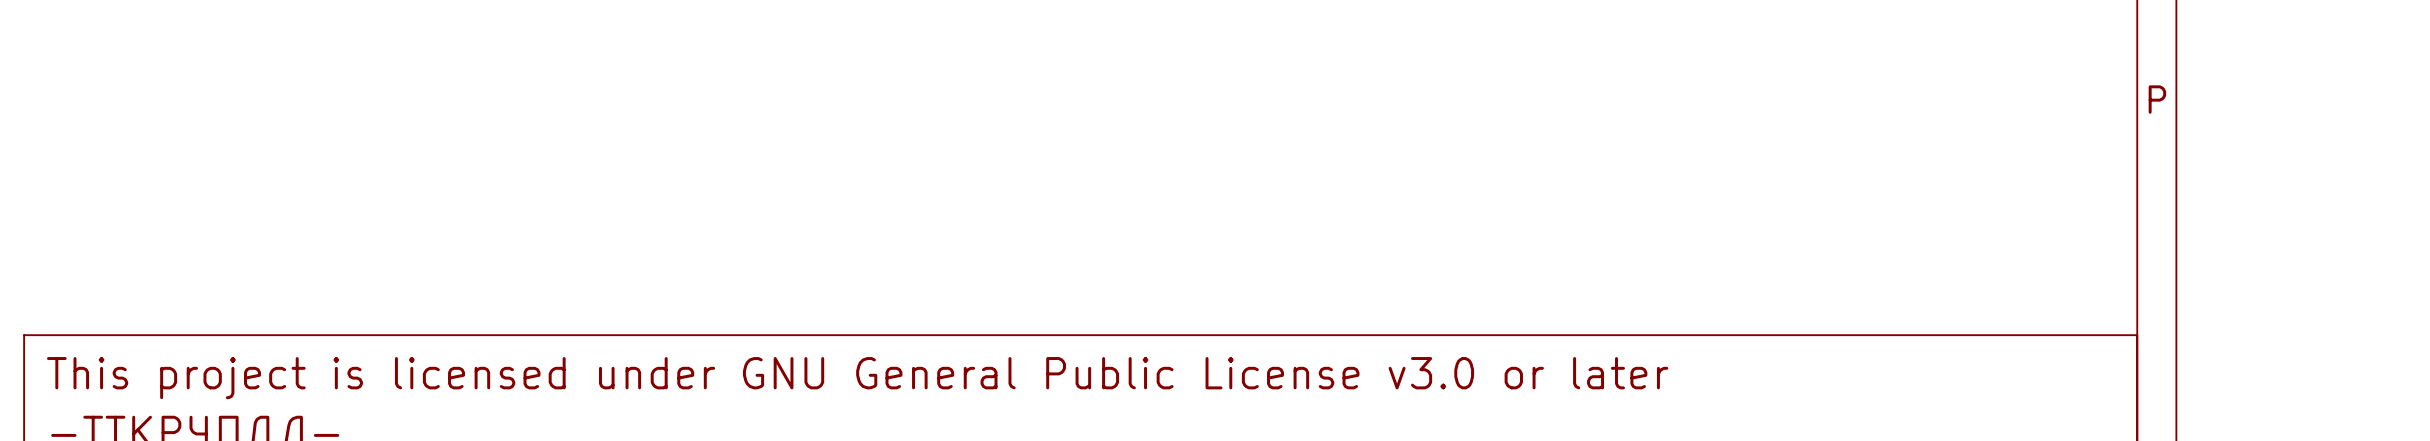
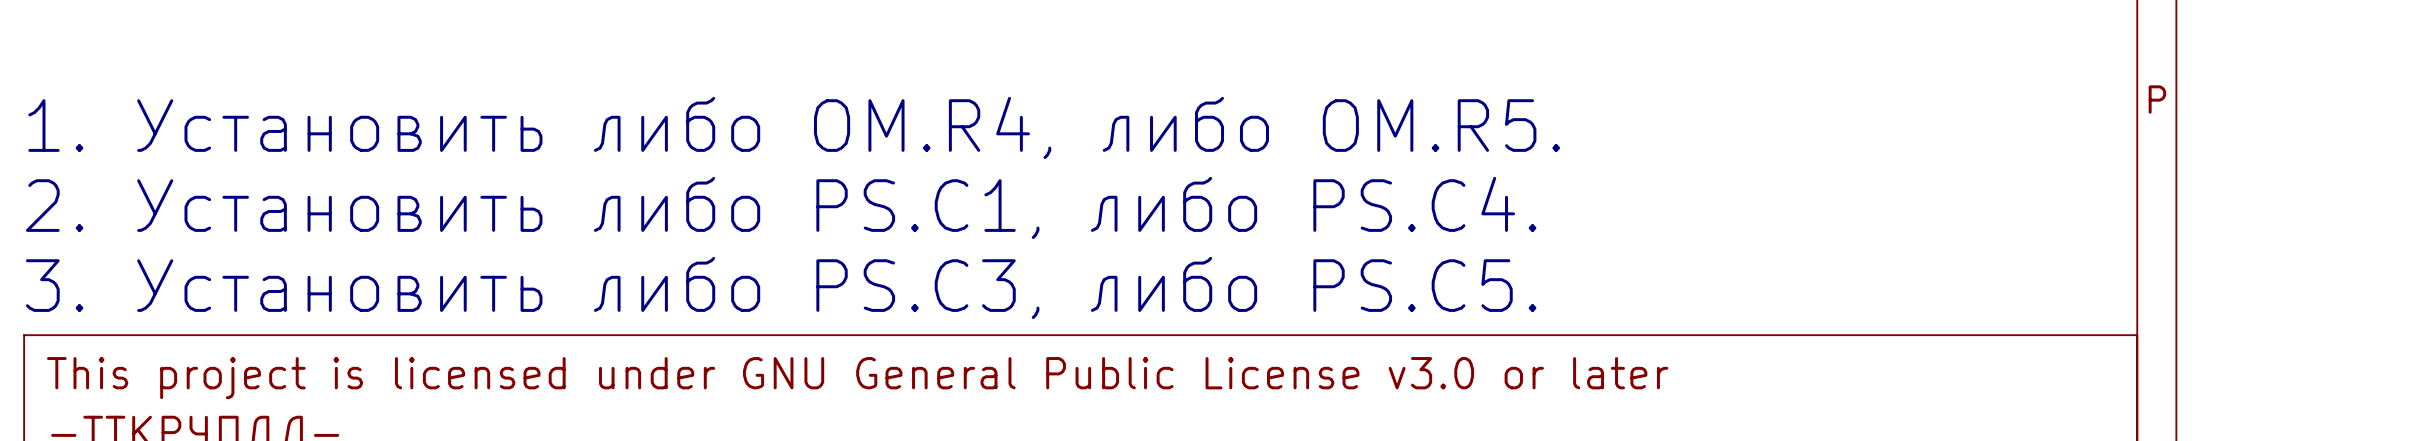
text: none -> 1. Установить либо OM.R4, либо OM.R5. (794, 127)
text: none -> 2. Установить либо PS.C1, либо PS.C4. (781, 207)
text: none -> 3. Установить либо PS.C3, либо PS.C5. (781, 287)

